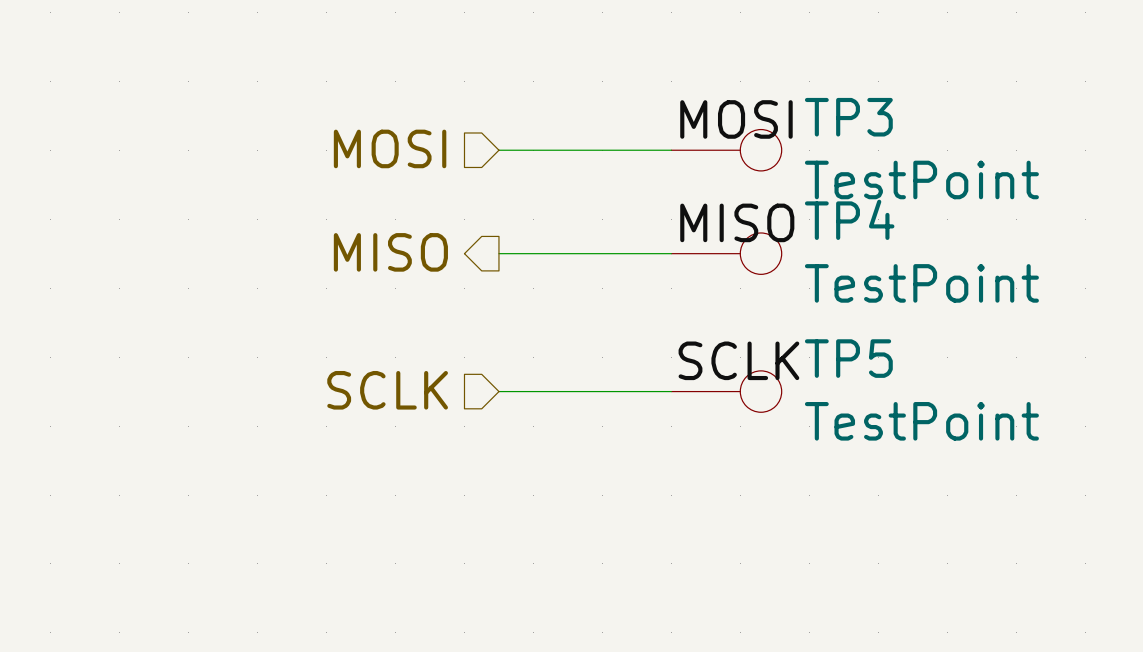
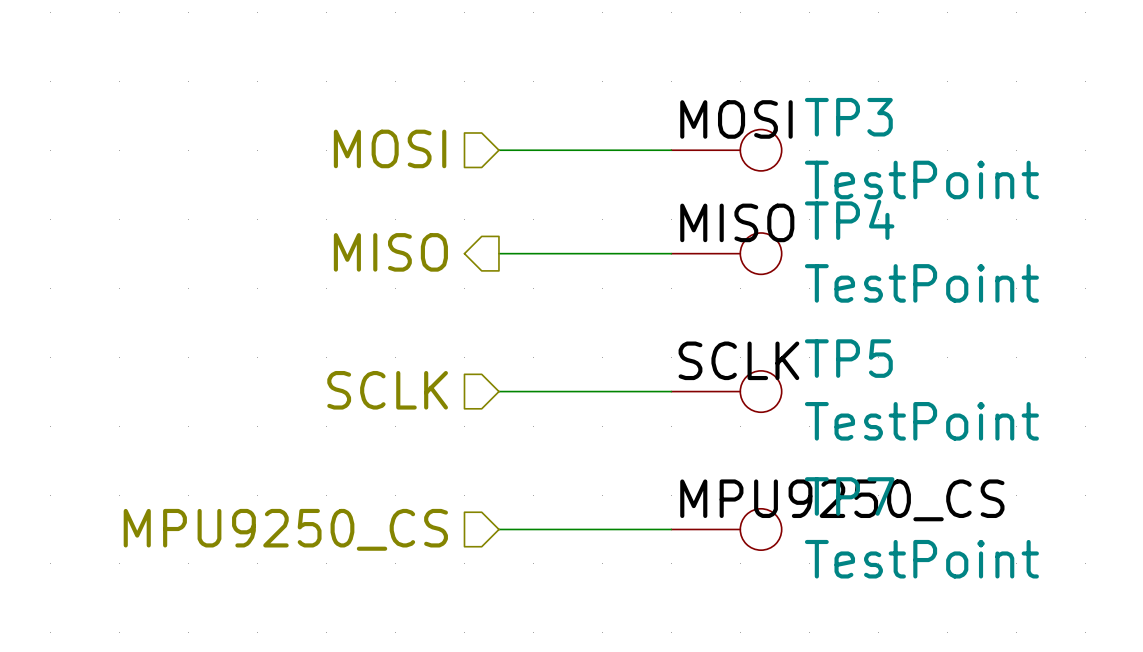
label: none -> MPU9250_CS (842, 500)
hierarchical label: none -> MPU9250_CS (285, 529)
wire: none -> (498, 529) (671, 529)
TP7: none -> TestPoint (726, 529)

